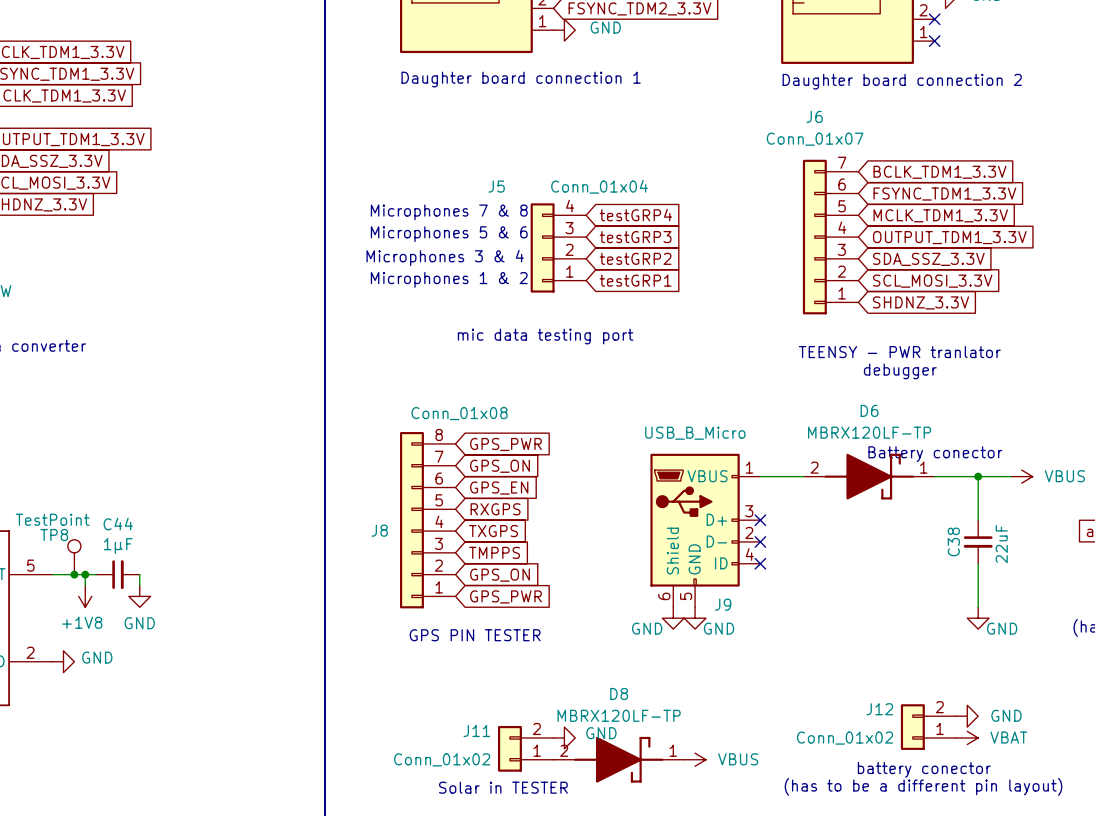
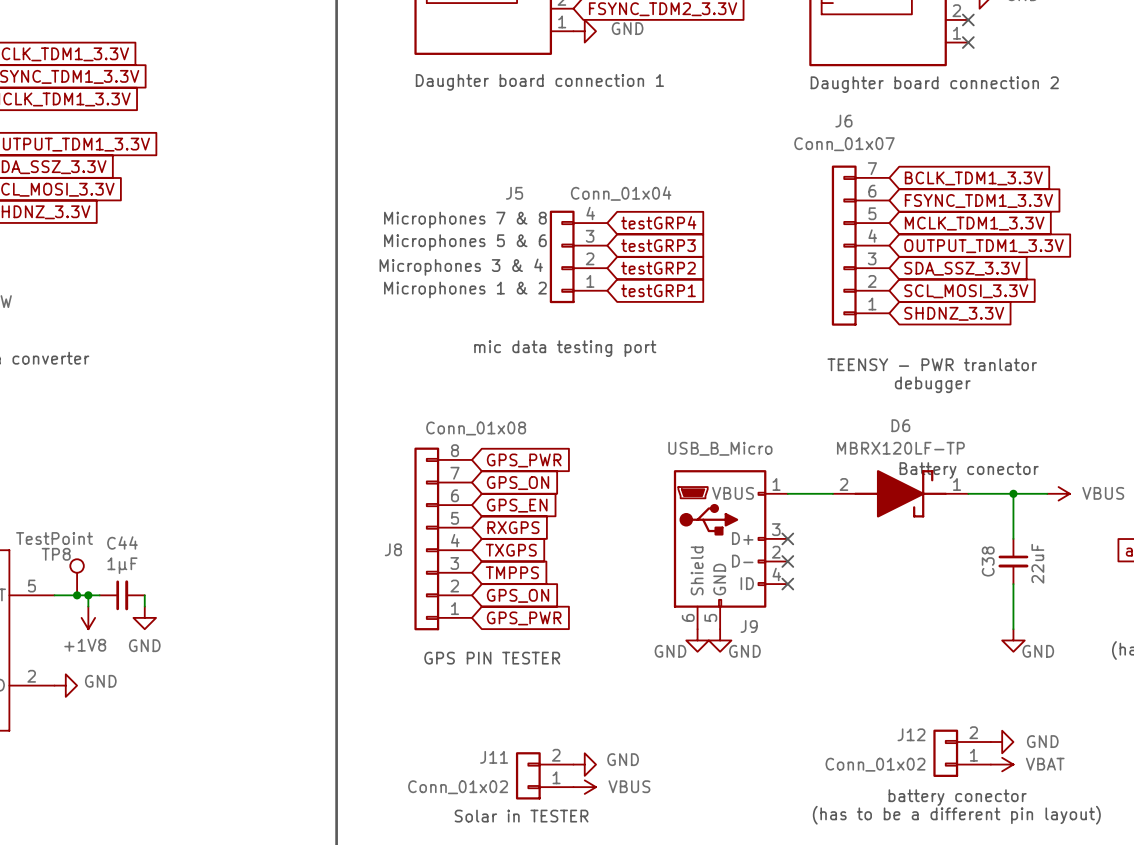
D8: MBRX120LF-TP (618, 759) -> none
power symbol position: VBUS (695, 759) -> VBUS (584, 787)

